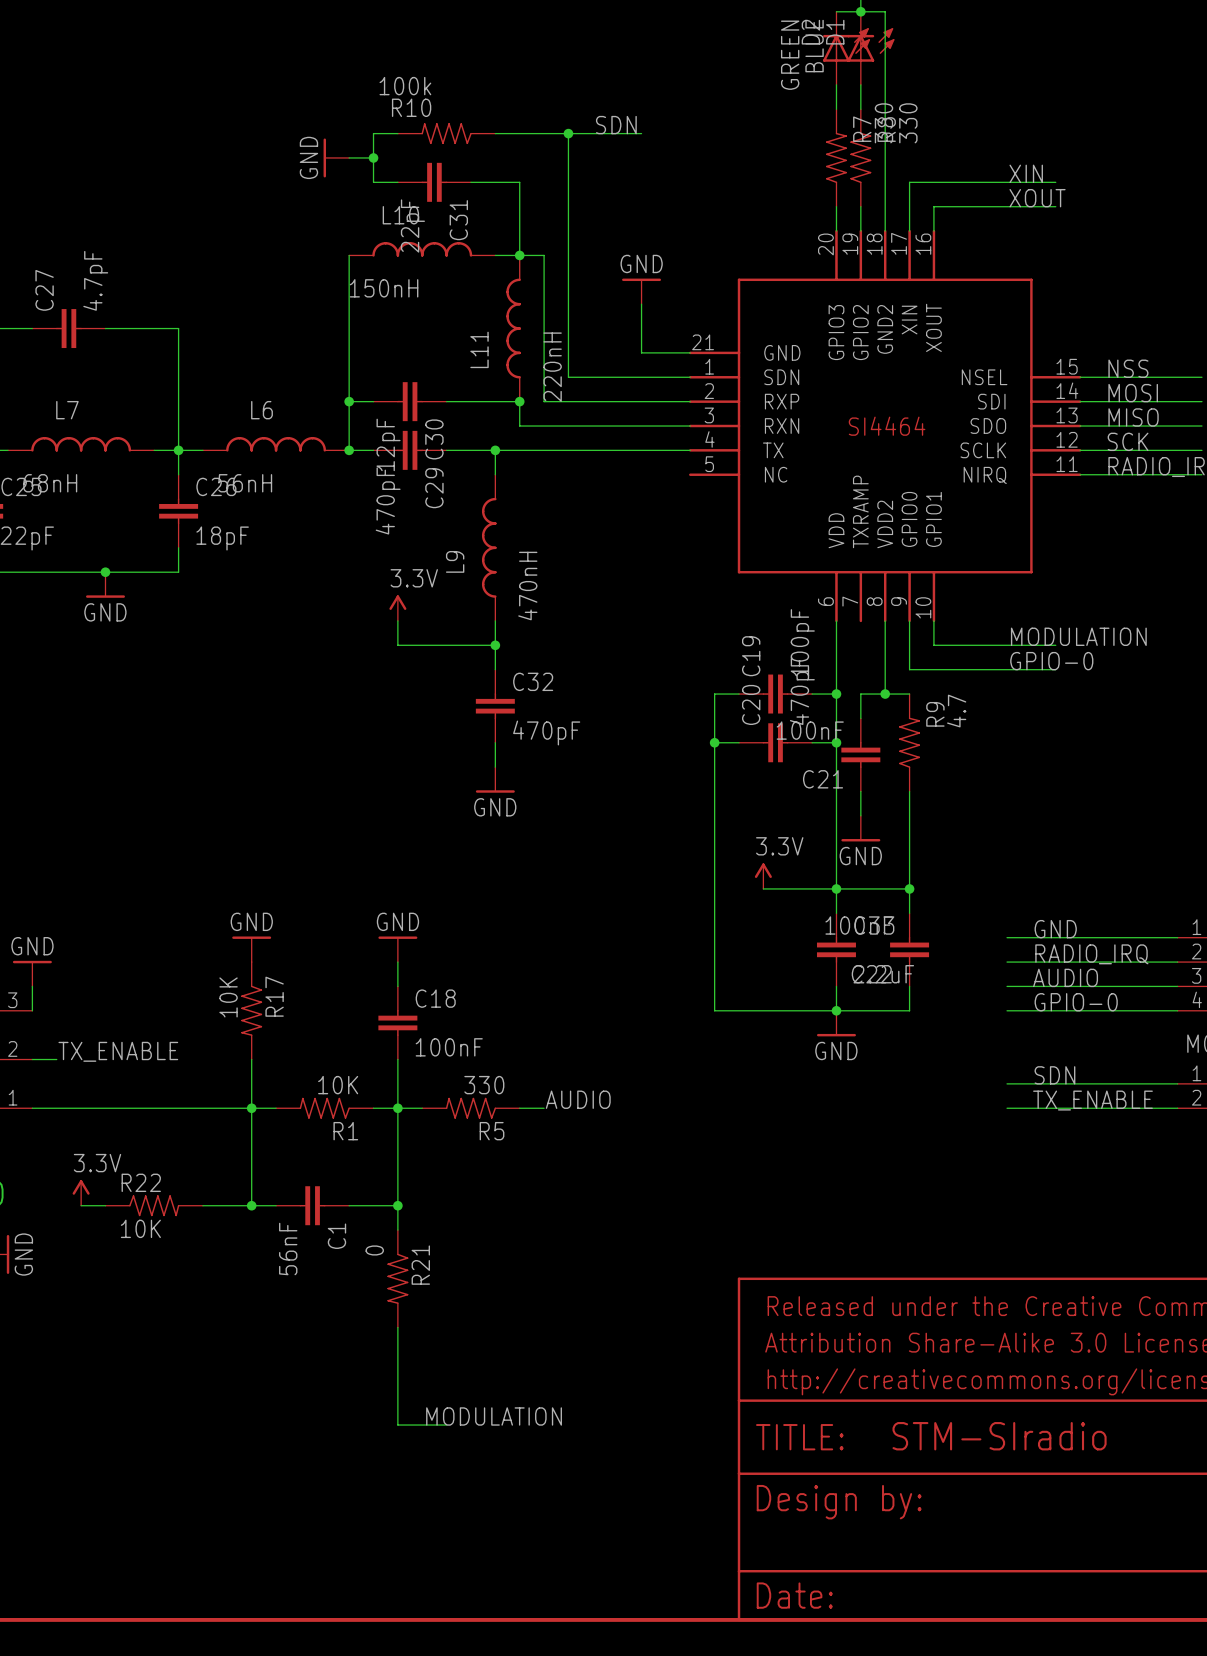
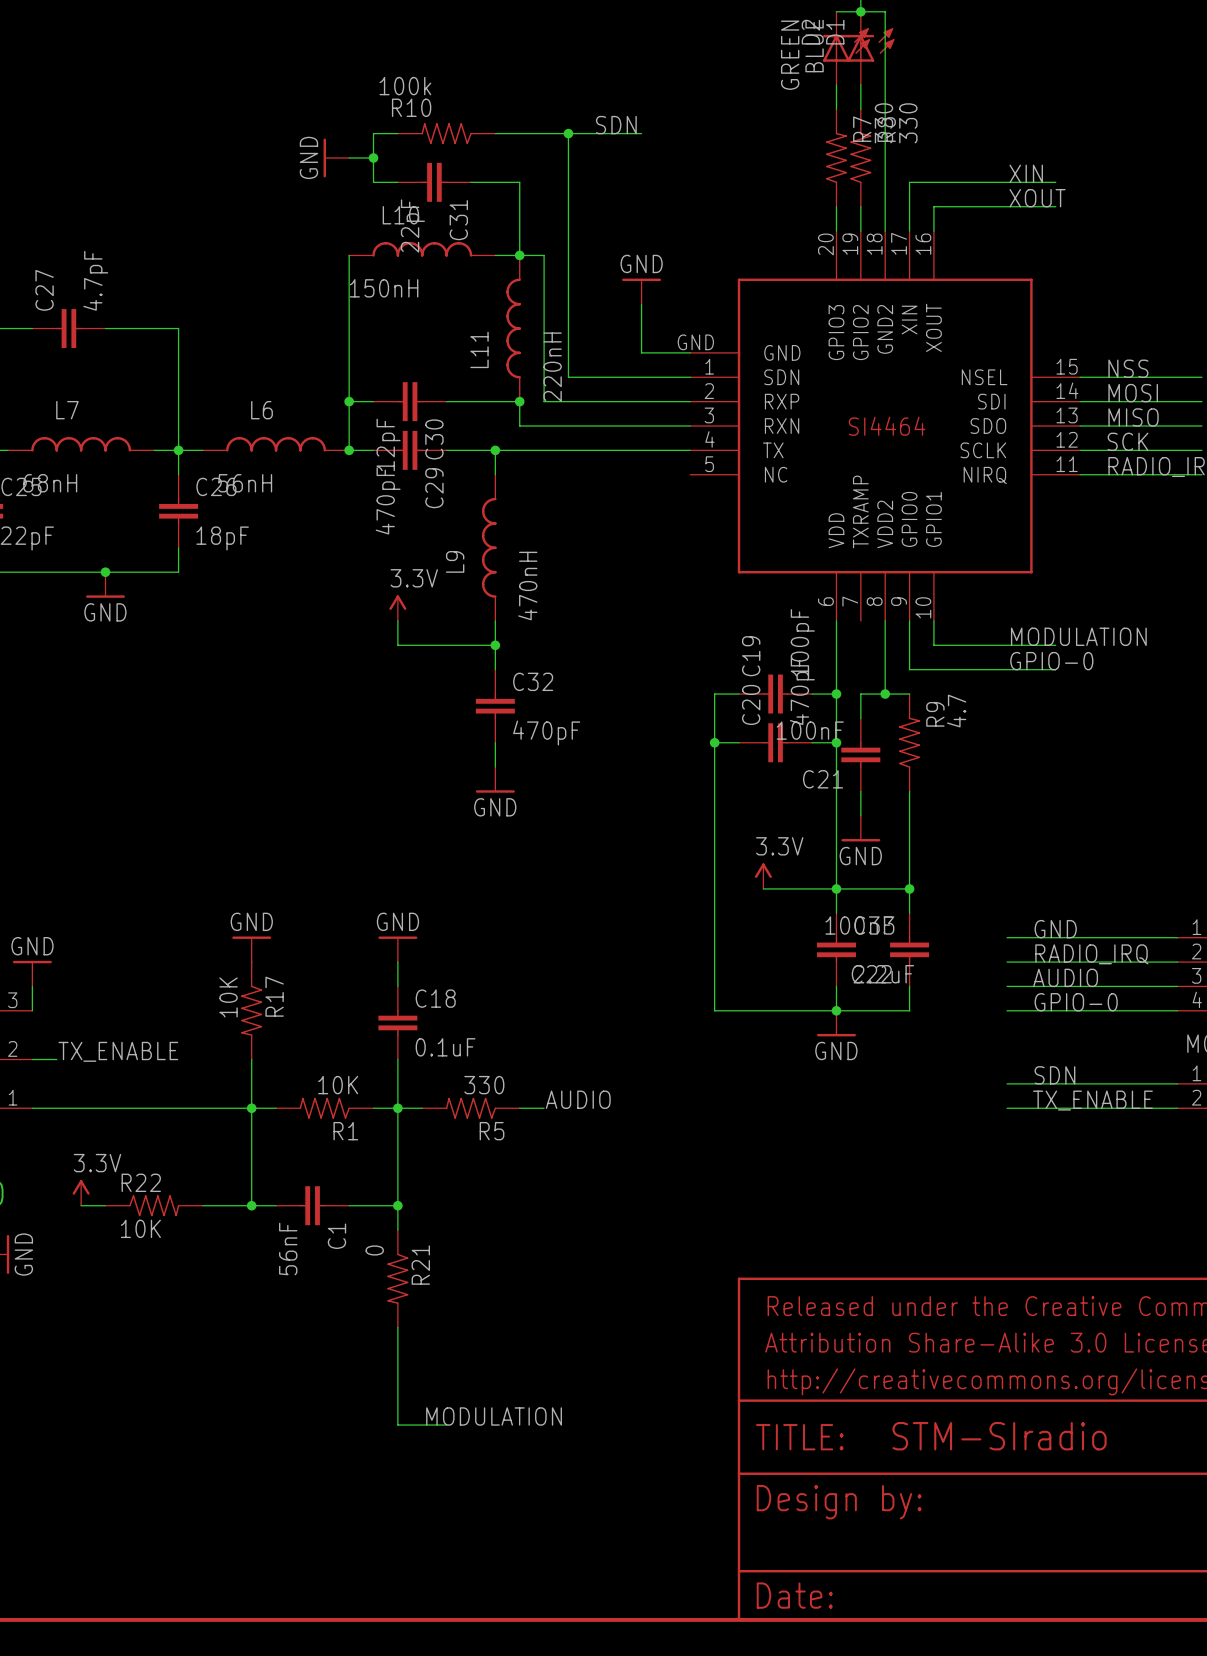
part symbol: [689, 229, 1082, 623] -> [690, 231, 1081, 621]
C18 value: 100nF (449, 1047) -> 0.1uF (445, 1047)

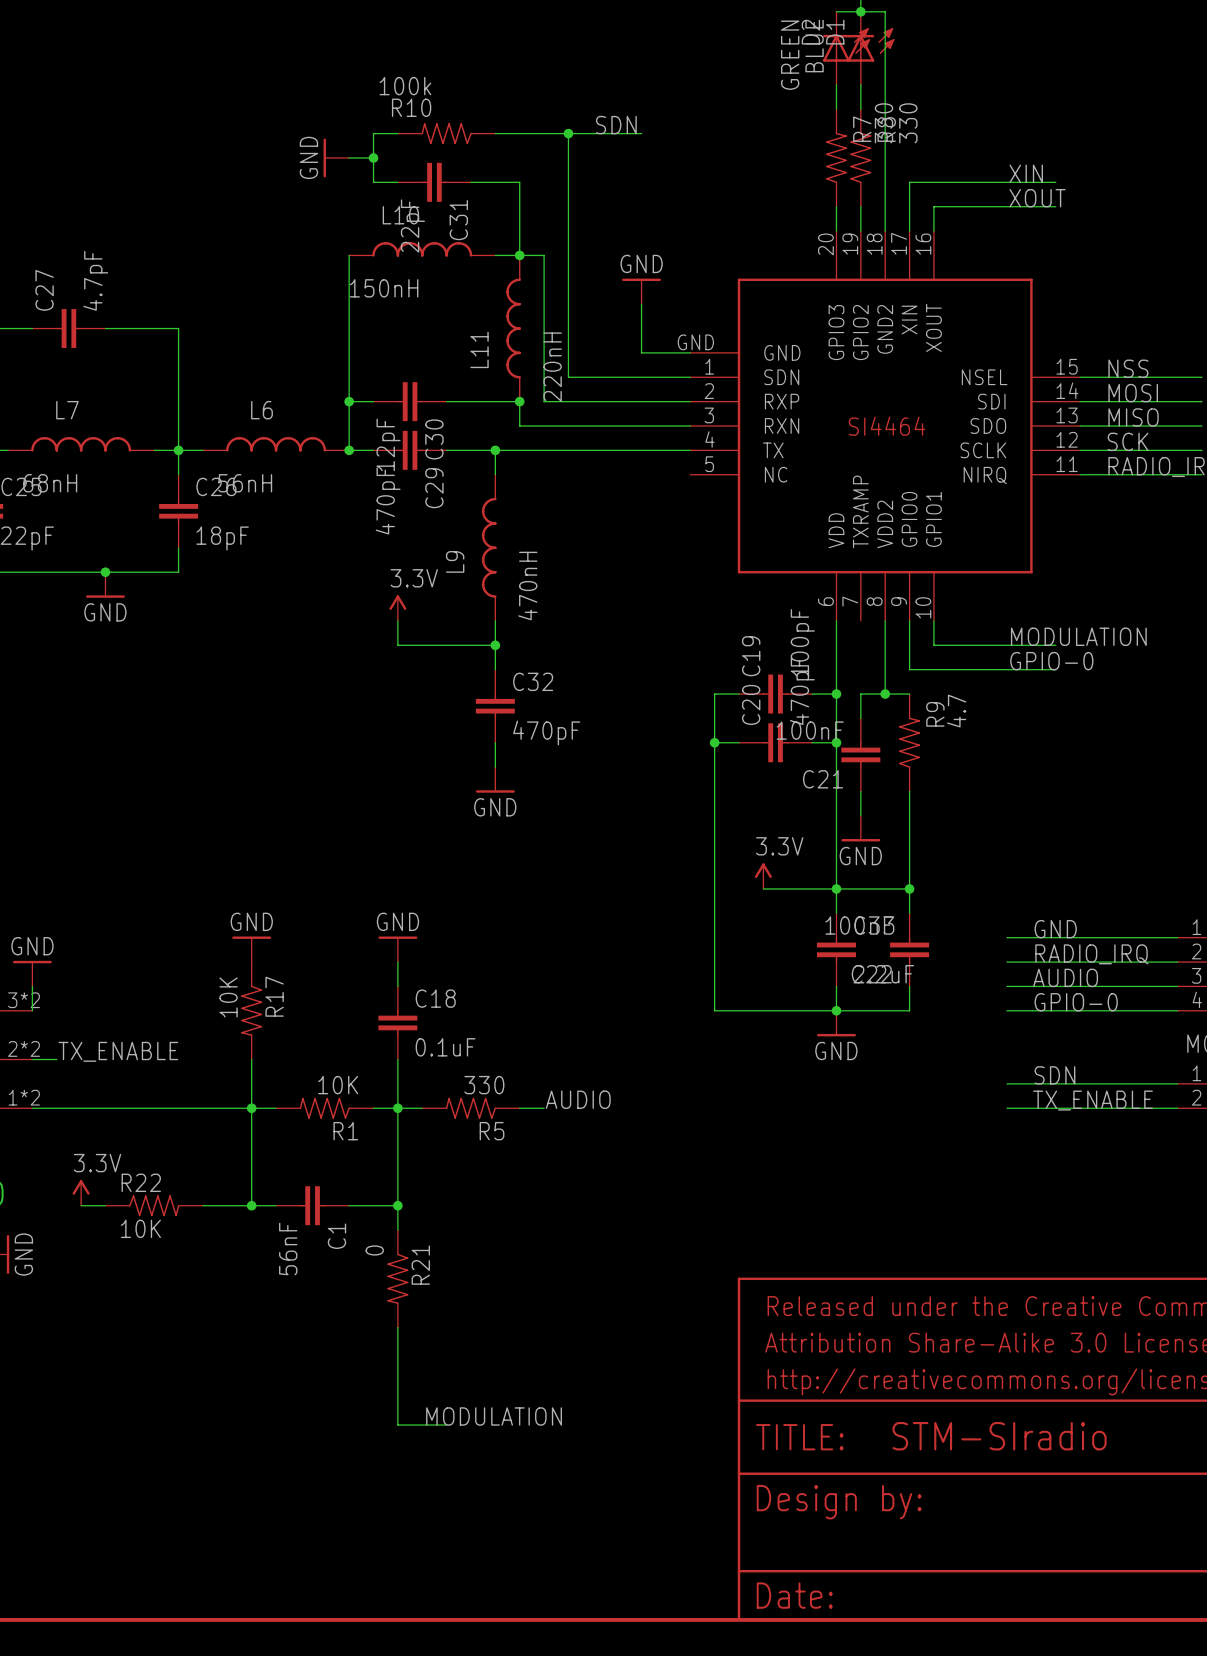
part pin number: 3 (12, 1000) -> 3*2 (24, 1000)
part pin number: 2 (12, 1048) -> 2*2 (24, 1048)
part pin number: 1 (13, 1097) -> 1*2 (24, 1097)

